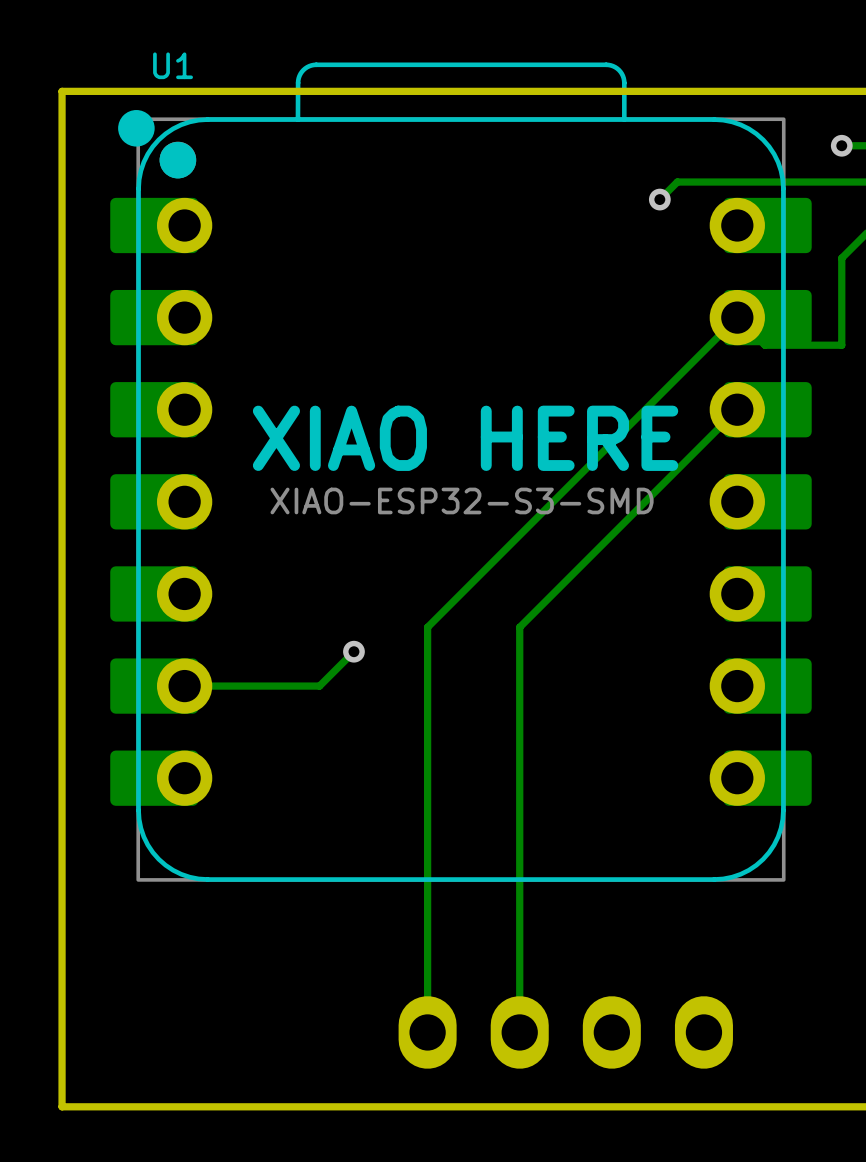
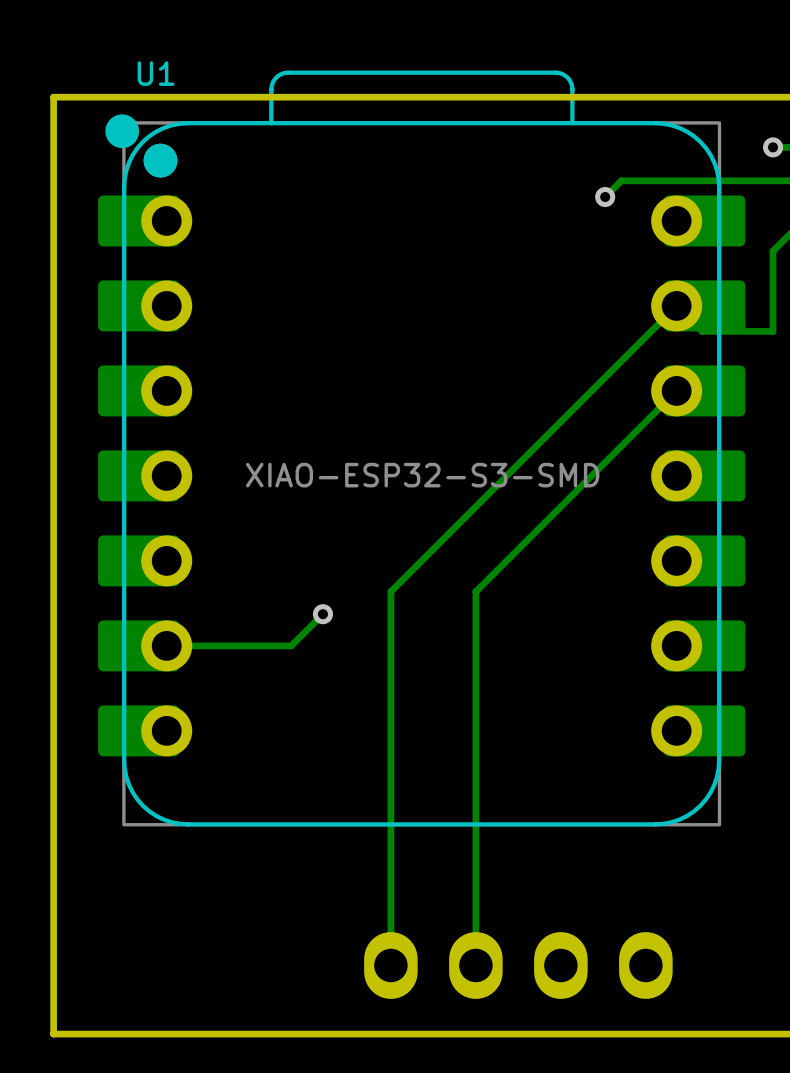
text: XIAO HERE (465, 438) -> none

